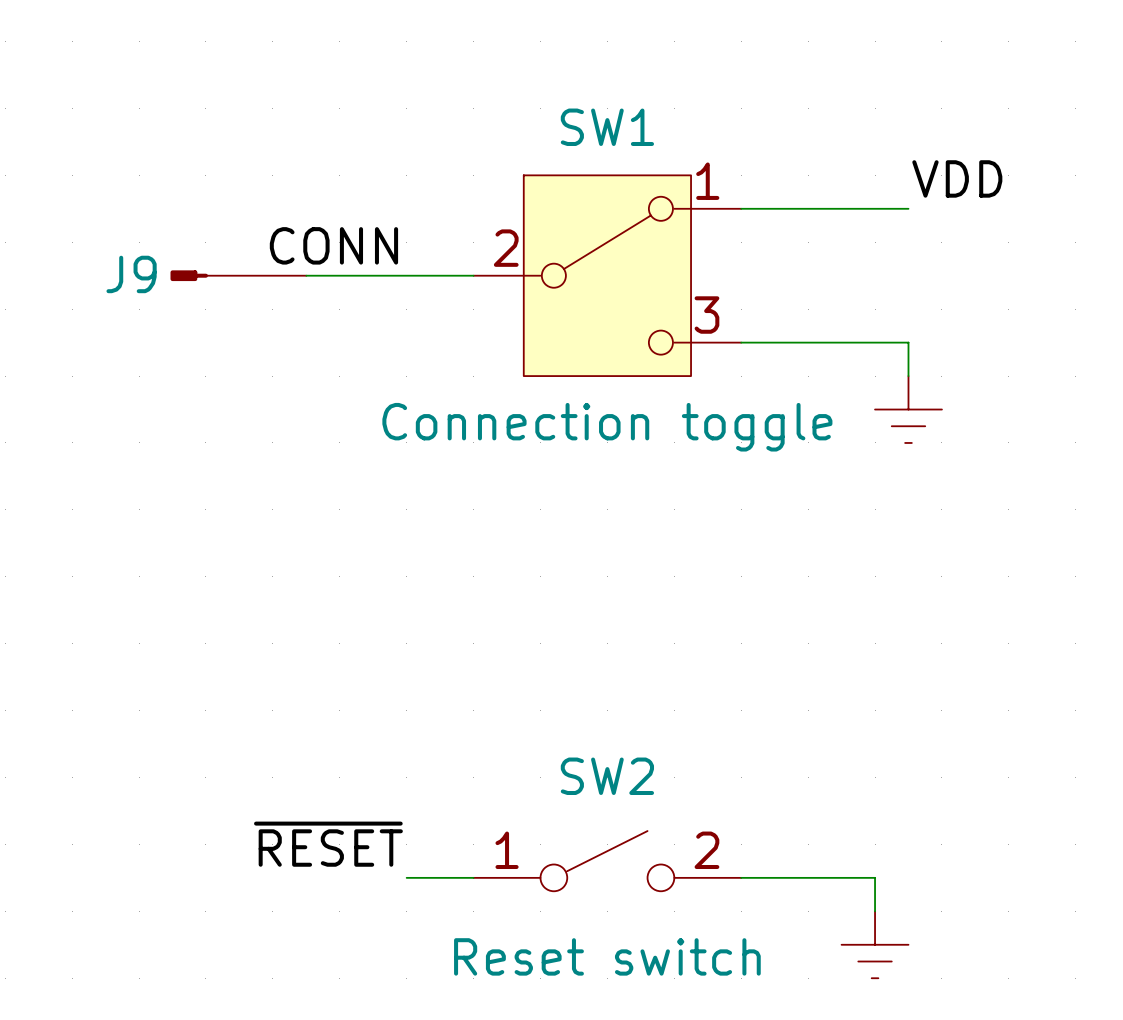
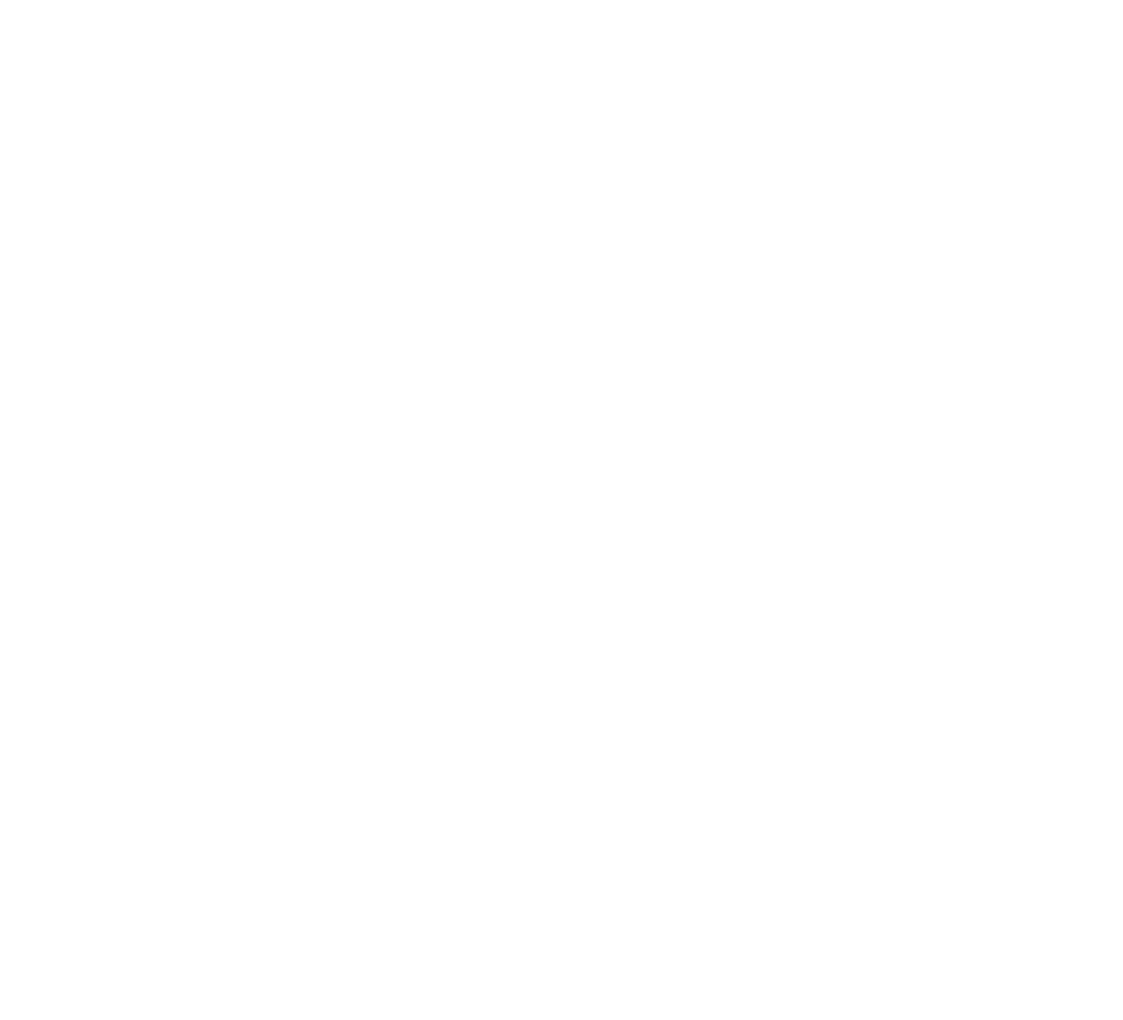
label: VDD (957, 178) -> none
wire: (741, 208) (908, 208) -> none
label: CONN (333, 245) -> none
J9: (238, 275) -> none
wire: (306, 275) (473, 275) -> none
SW1: Connection toggle (607, 275) -> none
wire: (741, 342) (908, 342) (908, 376) -> none
power symbol: (908, 409) -> none
label: ~{RESET} (328, 844) -> none
SW2: Reset switch (607, 861) -> none
wire: (406, 877) (473, 877) -> none
wire: (741, 877) (875, 877) (875, 911) -> none
power symbol: (875, 944) -> none

